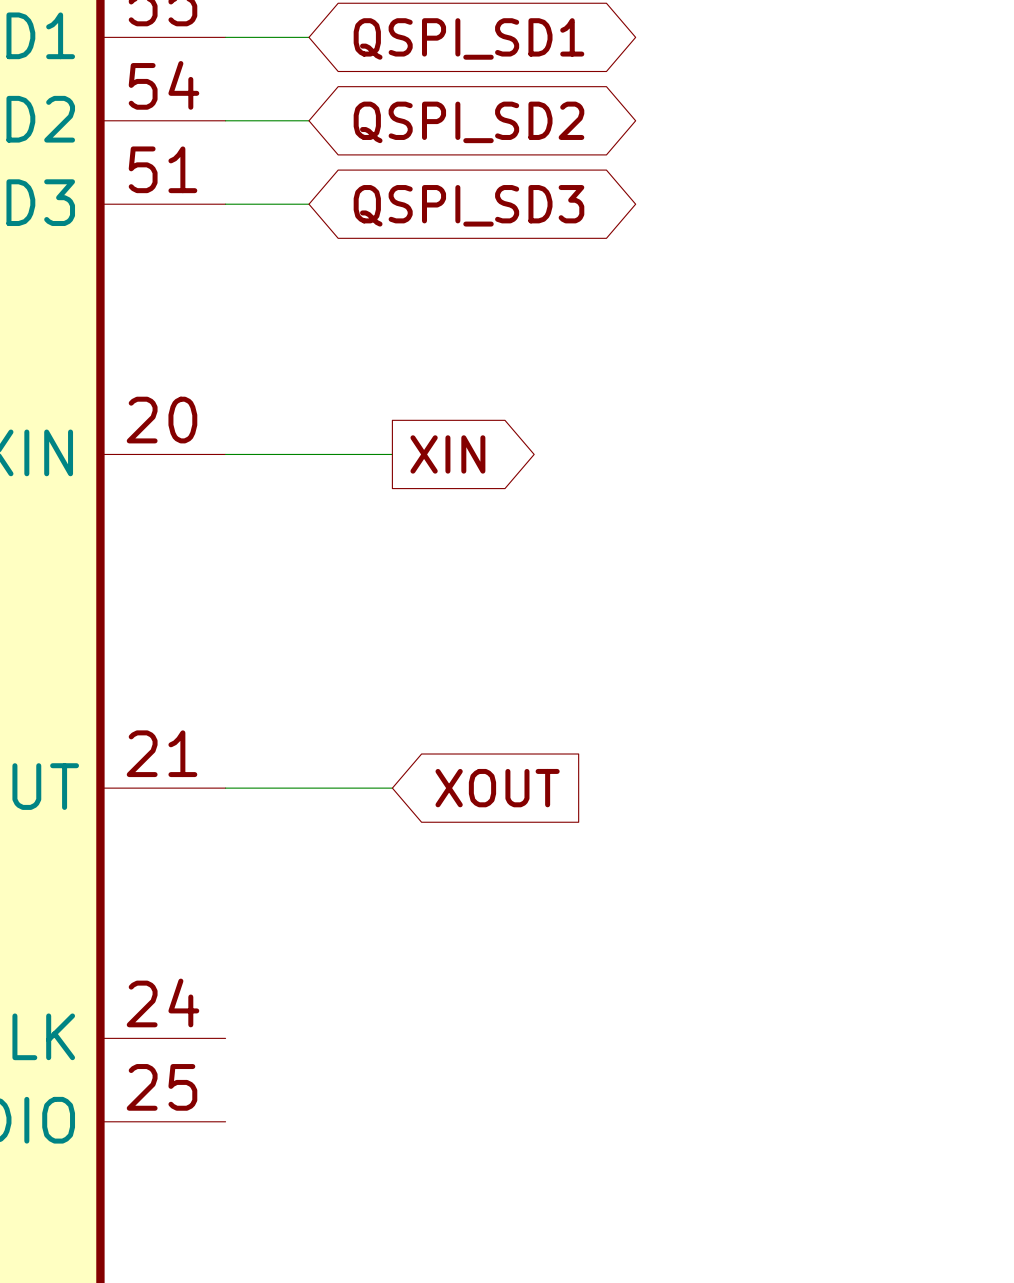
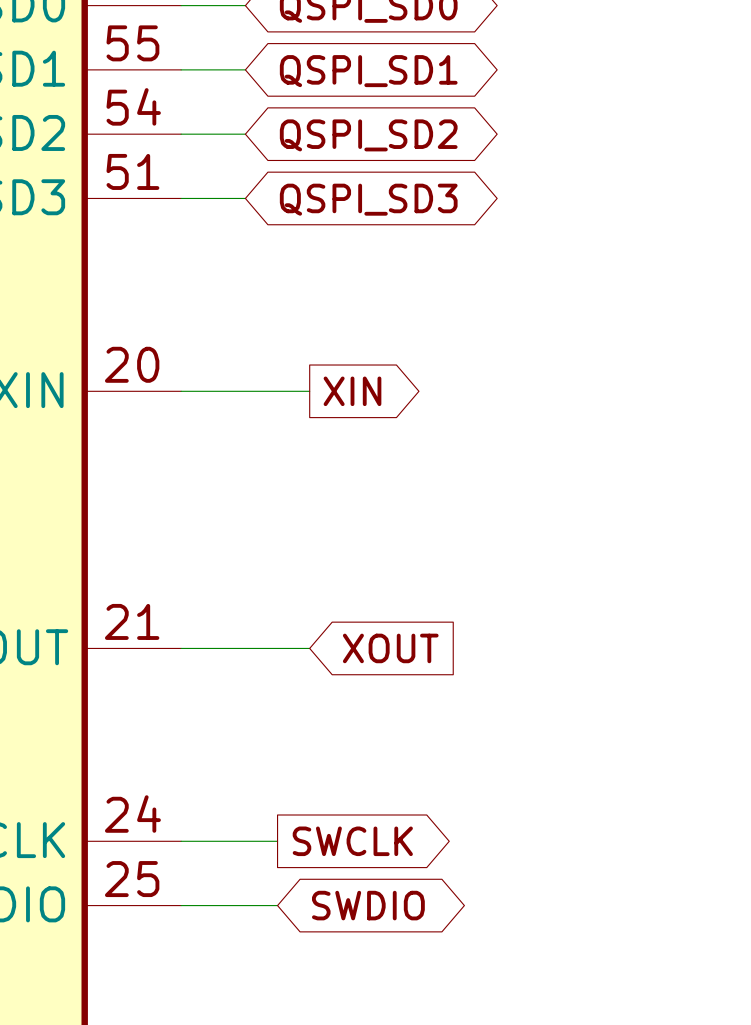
wire: none -> (181, 841) (277, 841)
global label: none -> SWCLK (352, 841)
wire: none -> (181, 905) (277, 905)
global label: none -> SWDIO (368, 905)

